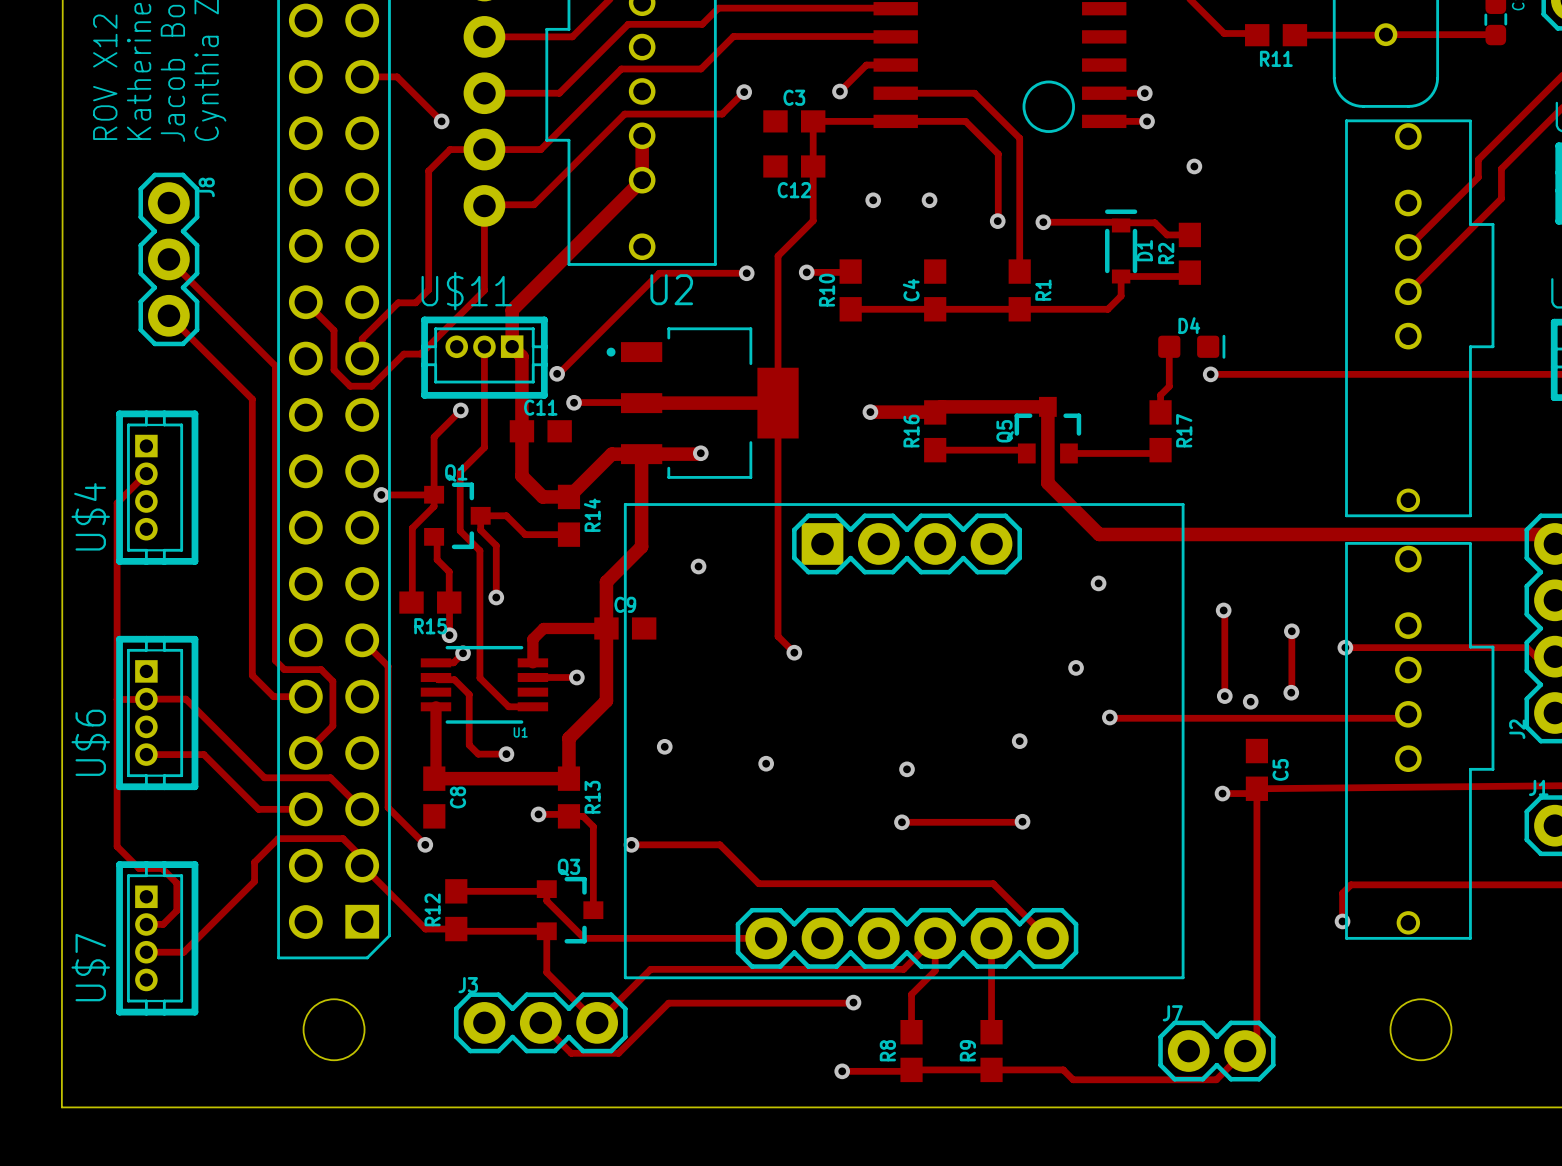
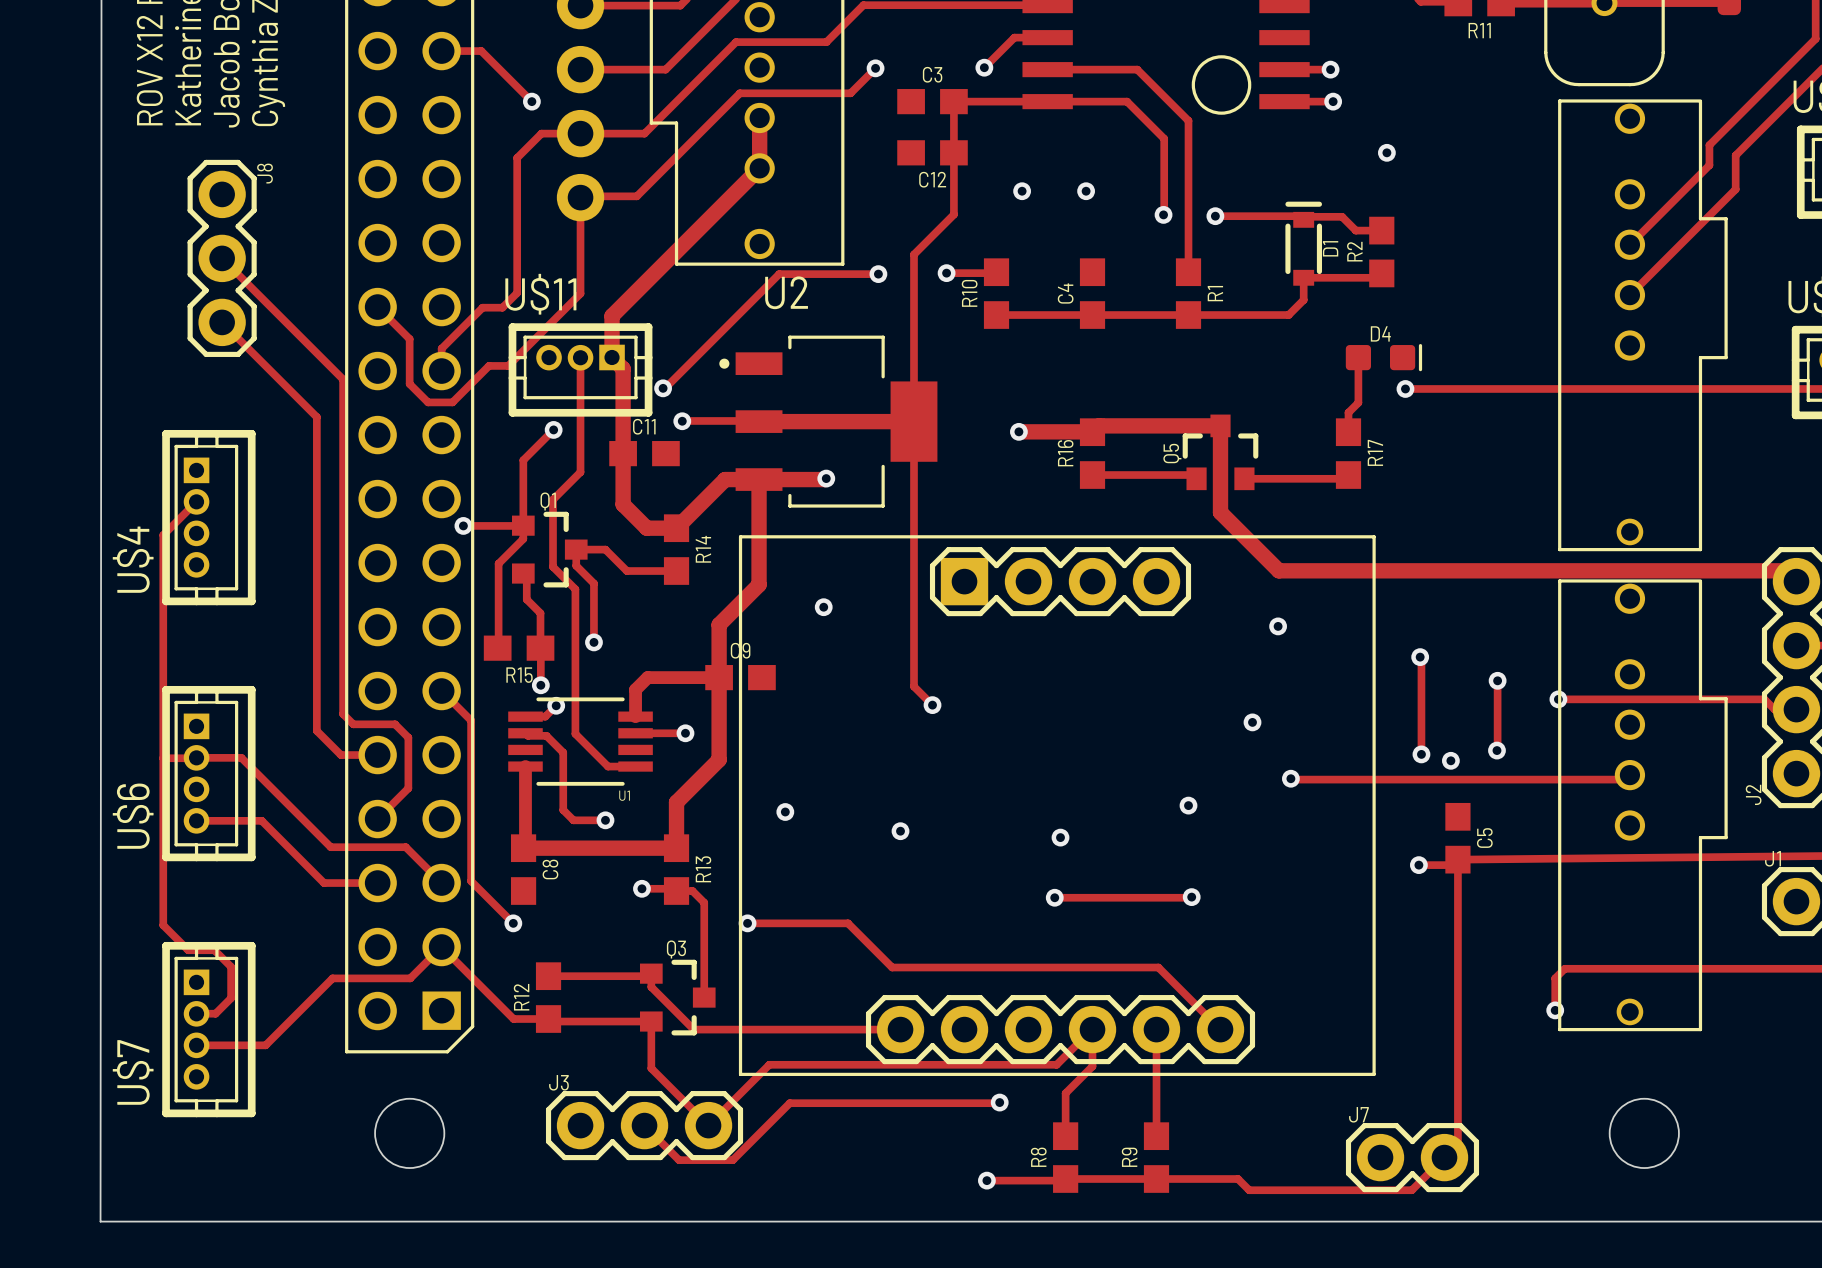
track: (362, 865) (362, 857) (343, 838) (278, 838) (254, 862) (254, 881) (183, 952) -> (441, 947) (410, 978) (332, 978) (265, 1045) (239, 1045)

